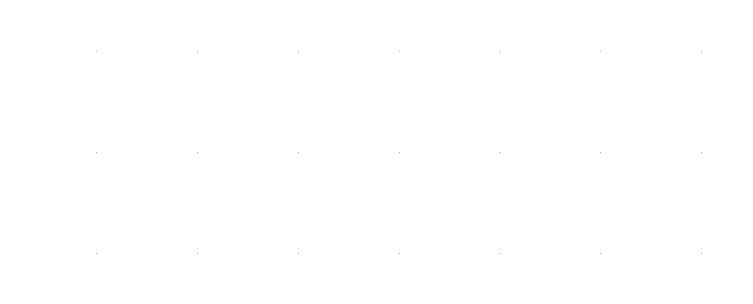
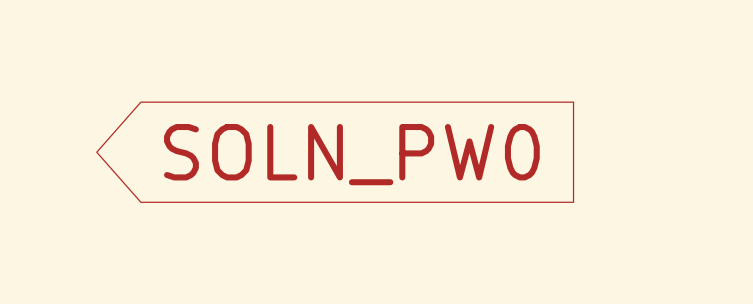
global label: none -> SOLN_PW0 (351, 154)

